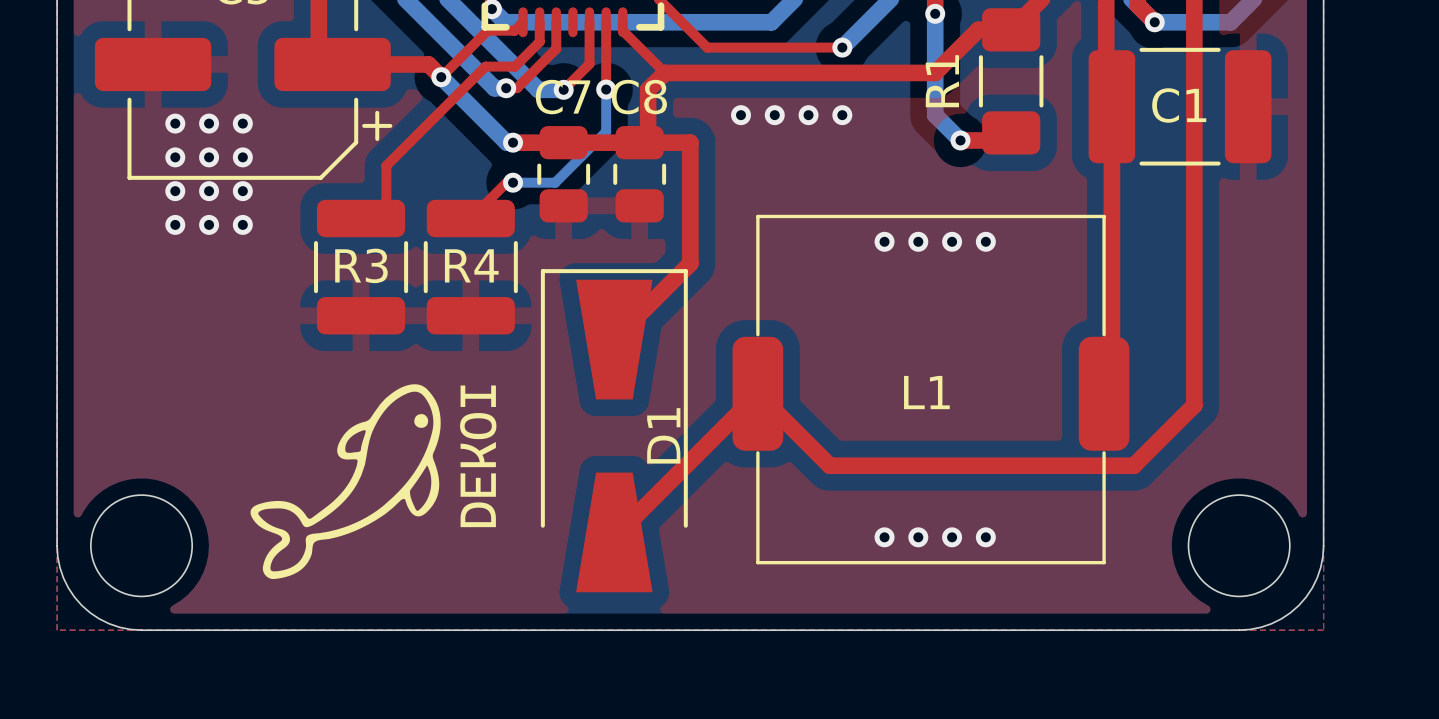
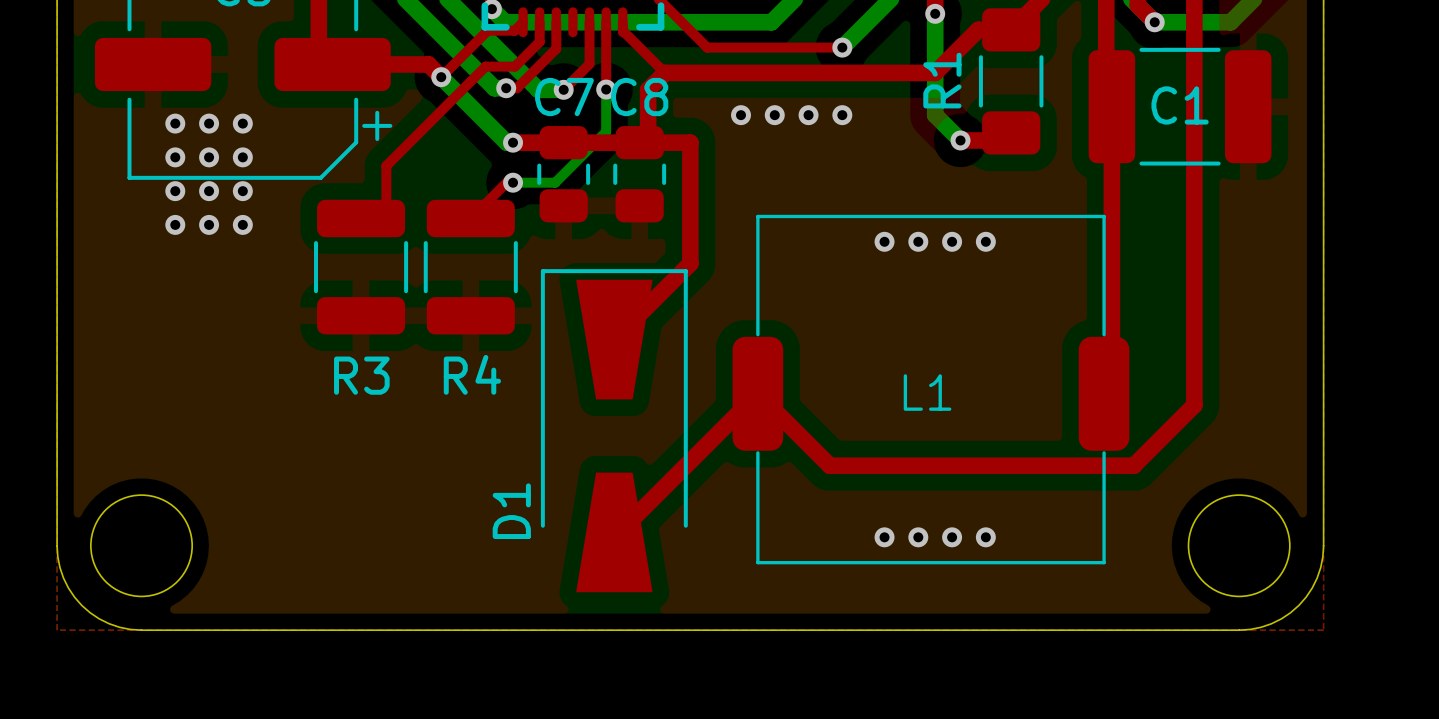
R3 name position: R3 (361, 265) -> R3 (361, 375)
R4 name position: R4 (471, 265) -> R4 (472, 374)
drawing: [250, 384, 497, 580] -> none
D1 name position: D1 (663, 435) -> D1 (511, 511)

